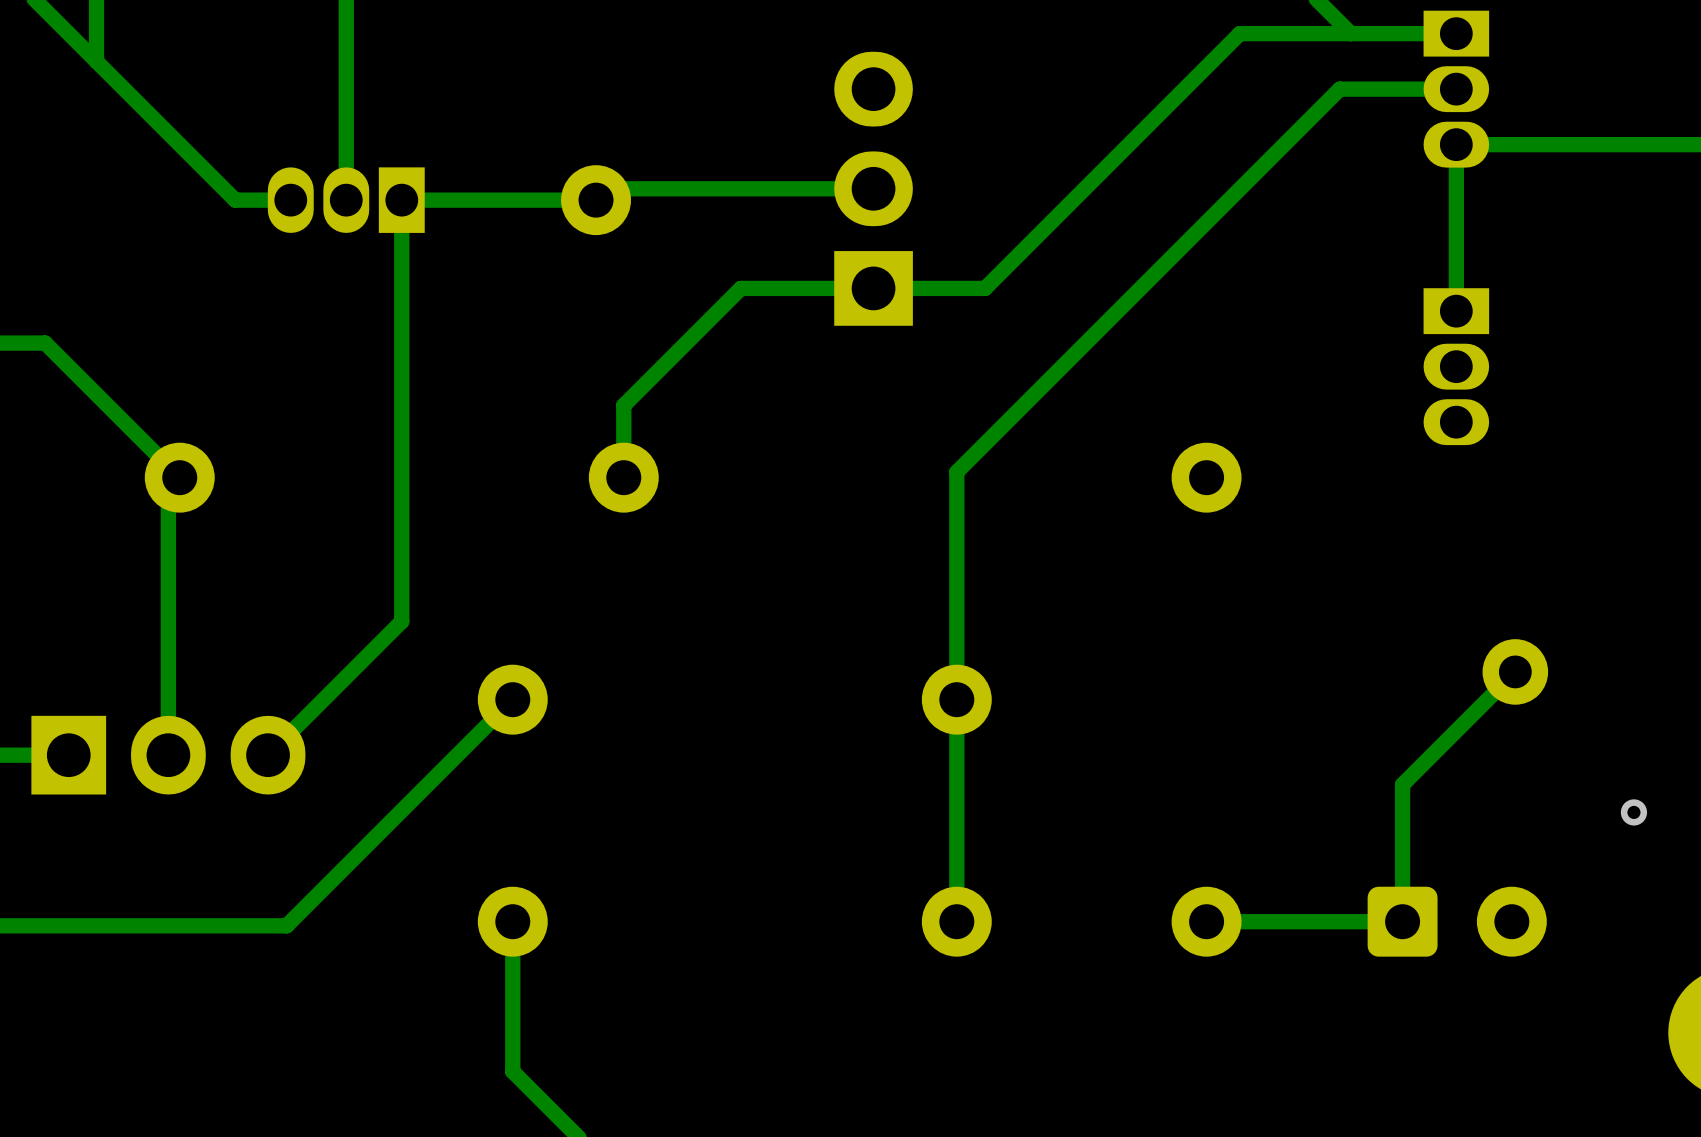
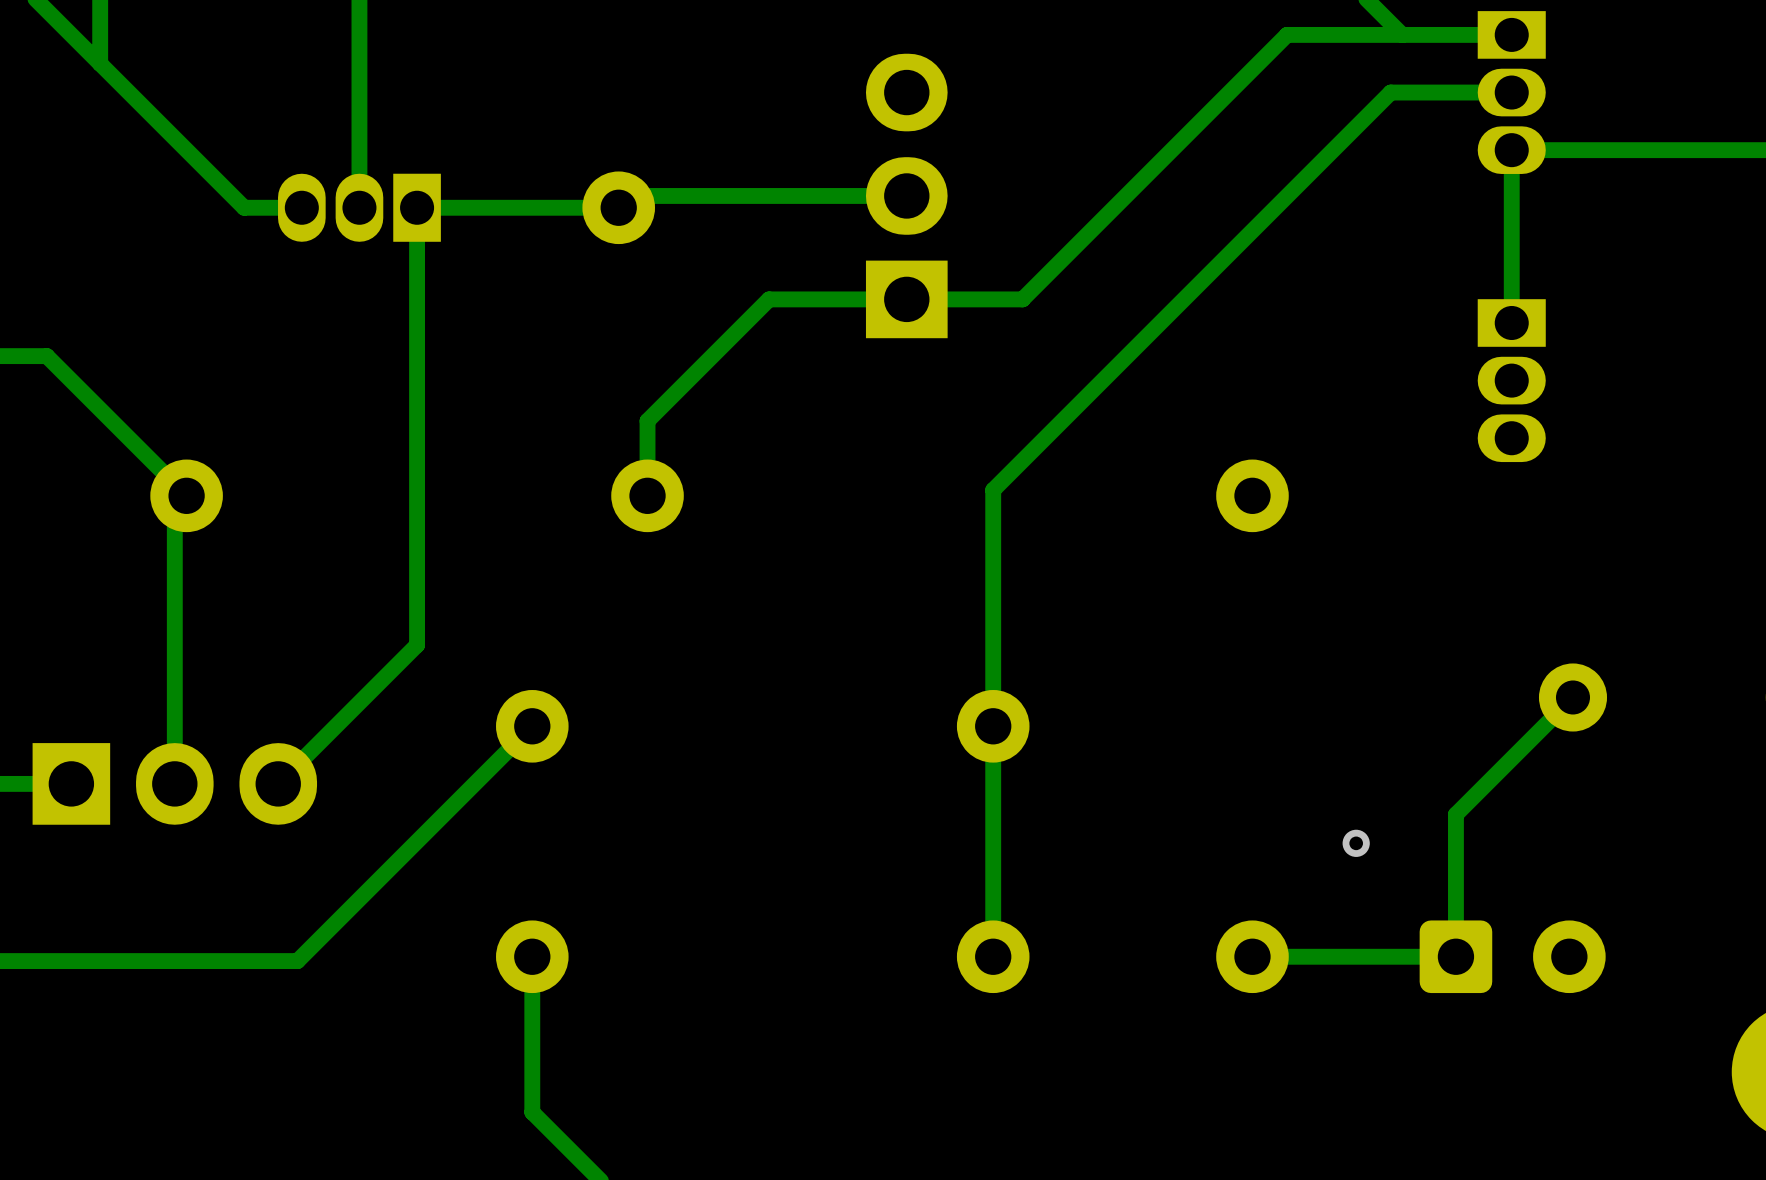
via: none -> (1356, 843)
via: (1633, 812) -> none

